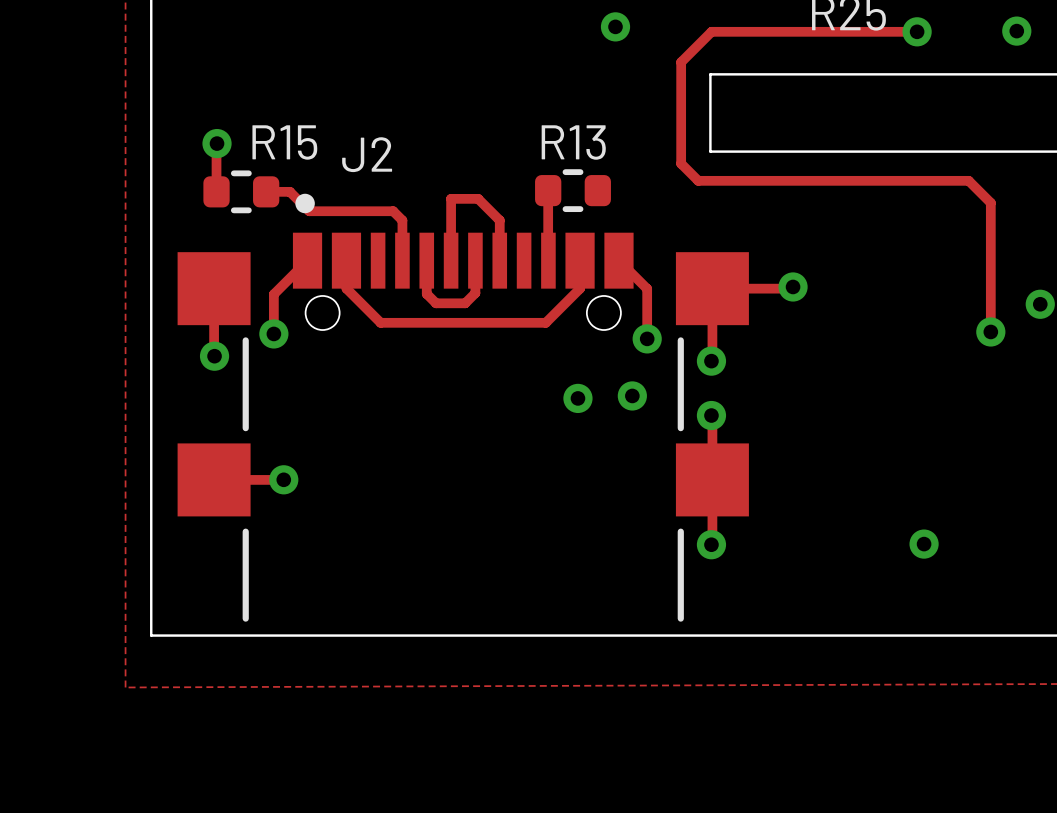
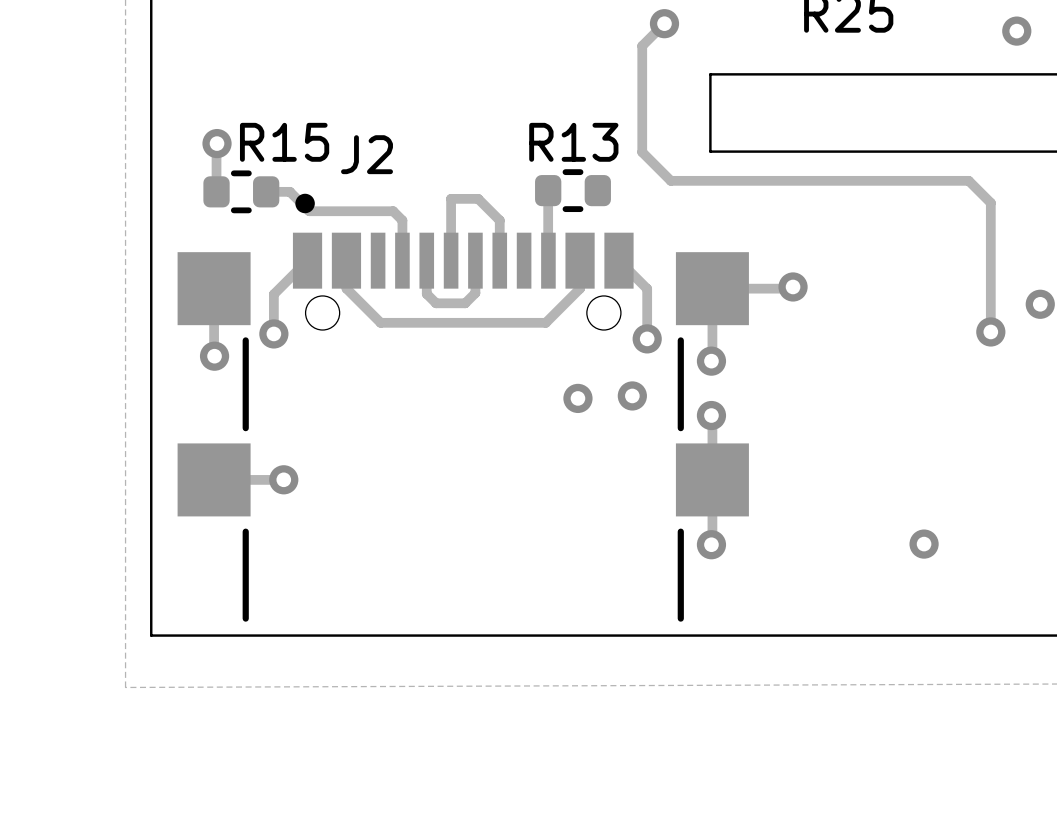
via: none -> (664, 23)
via: (615, 26) -> none
track: (917, 31) (711, 31) (681, 62) (681, 163) (698, 180) -> (664, 23) (642, 45) (642, 152) (670, 180) (698, 180)
via: (917, 31) -> none

